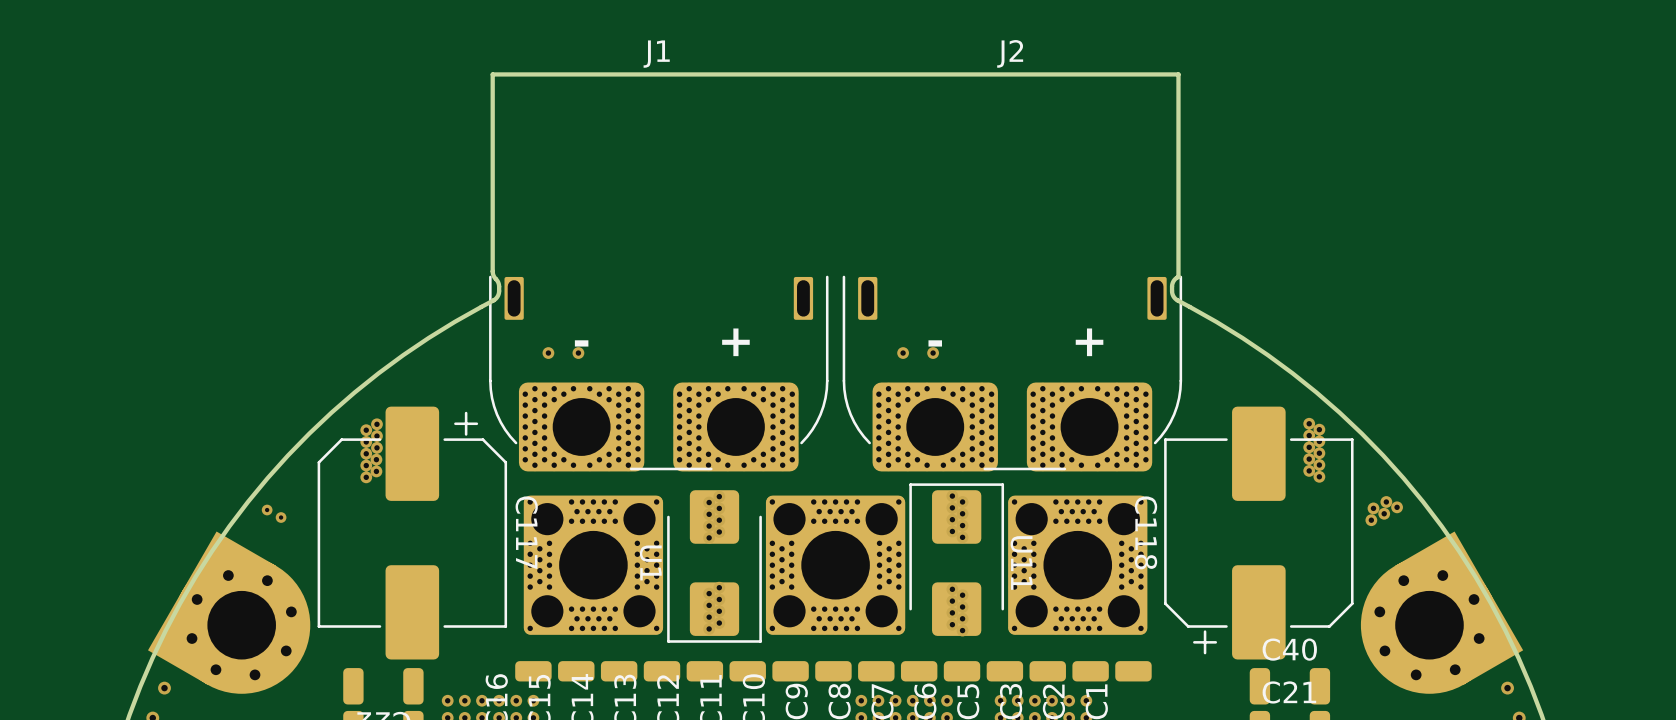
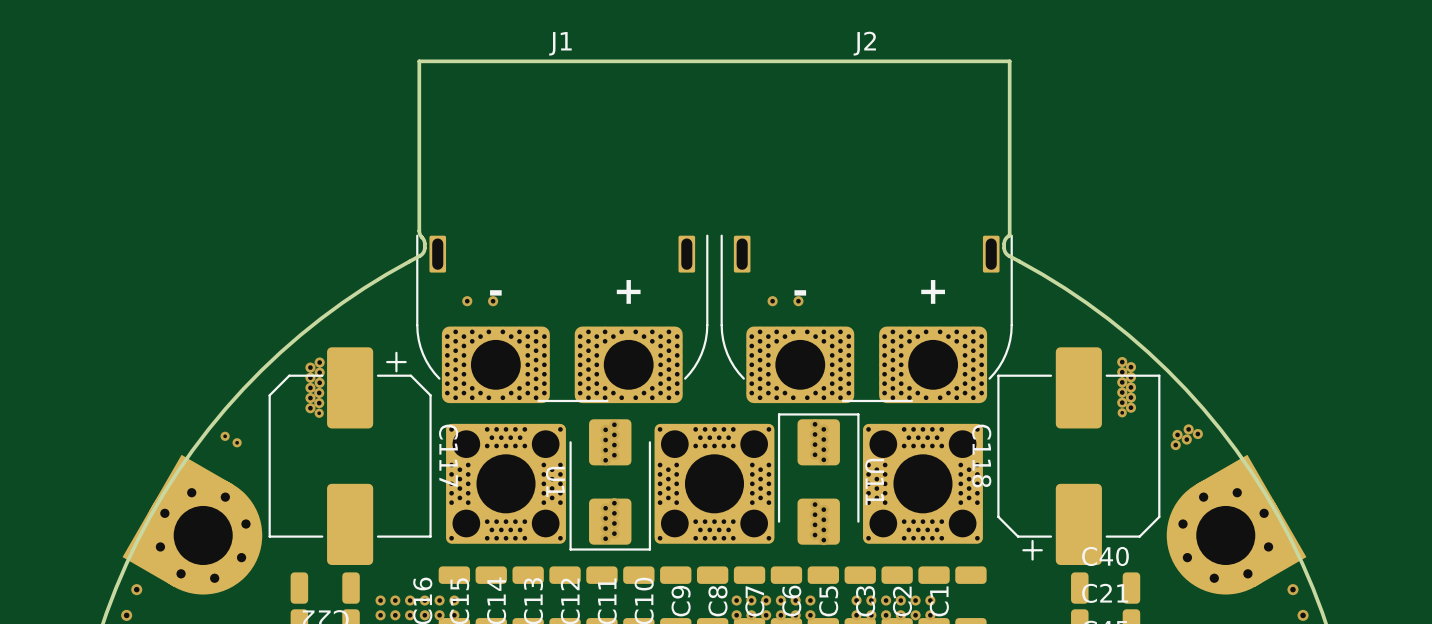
via: none -> (1122, 412)
via: none -> (319, 413)

